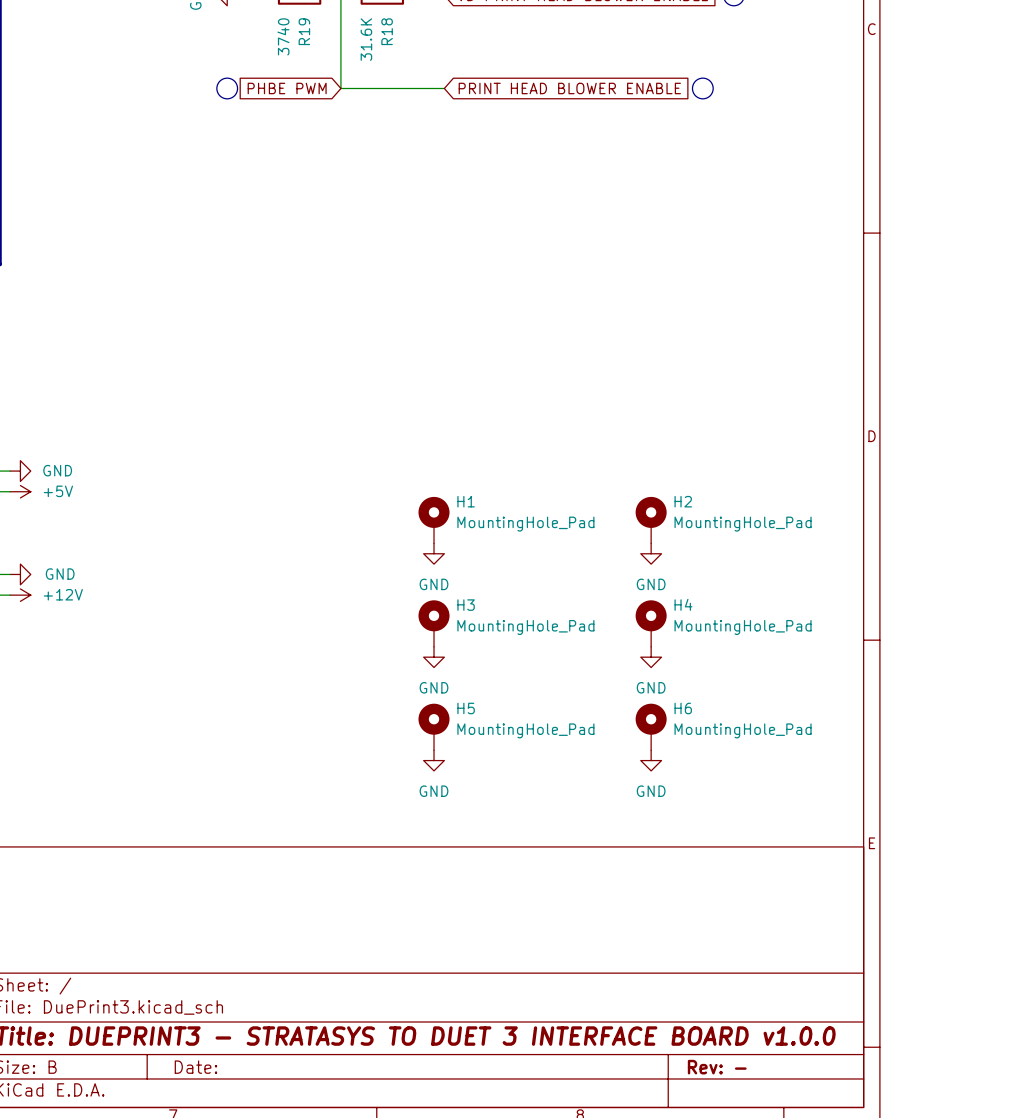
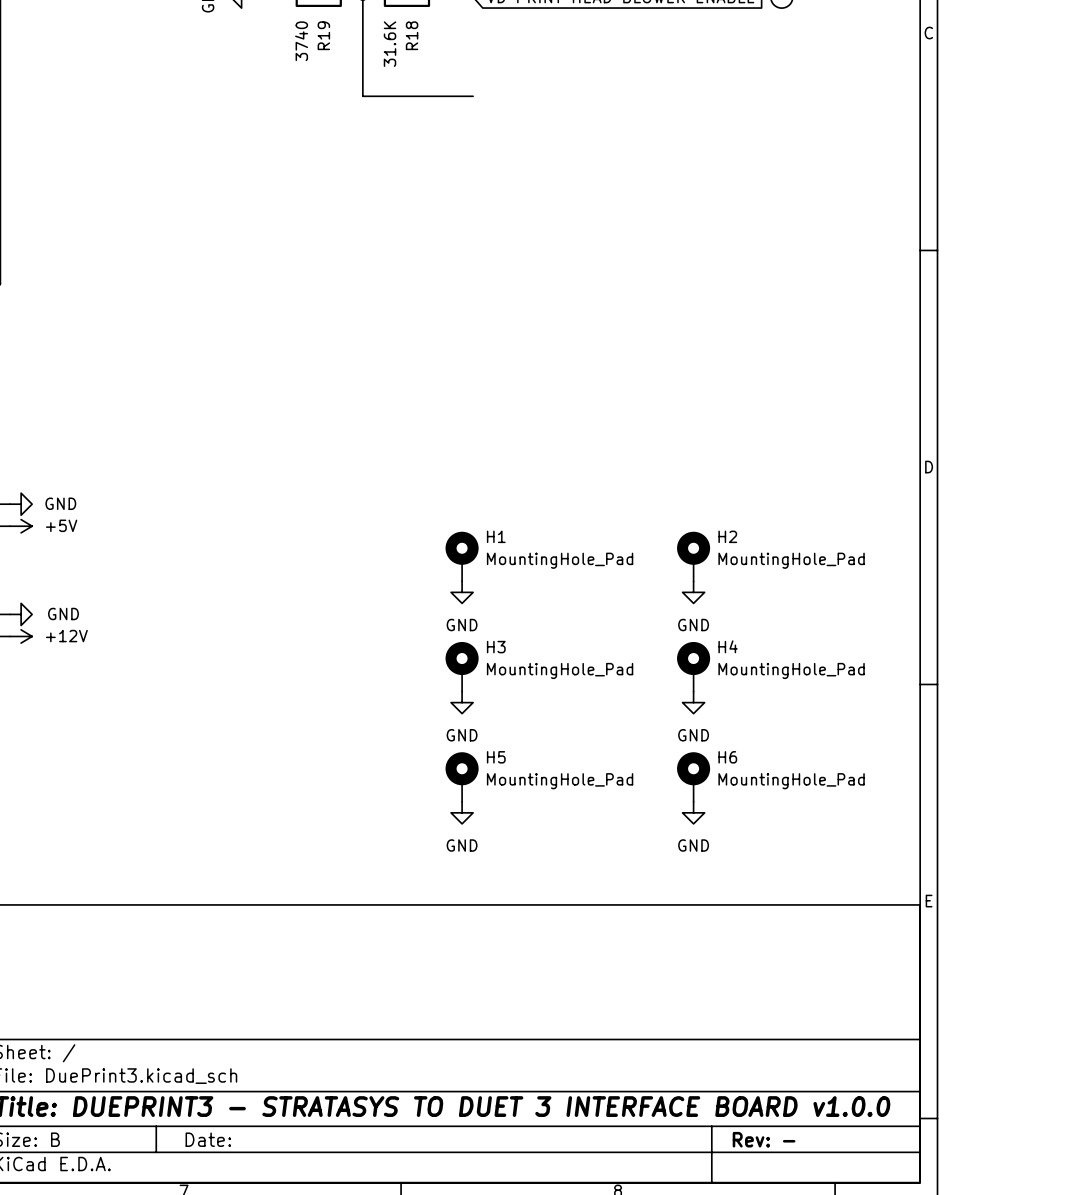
drawing: [216, 78, 238, 99] -> none
drawing: [692, 78, 714, 99] -> none
global label: PHBE PWM (287, 88) -> none
global label: PRINT HEAD BLOWER ENABLE (569, 88) -> none

